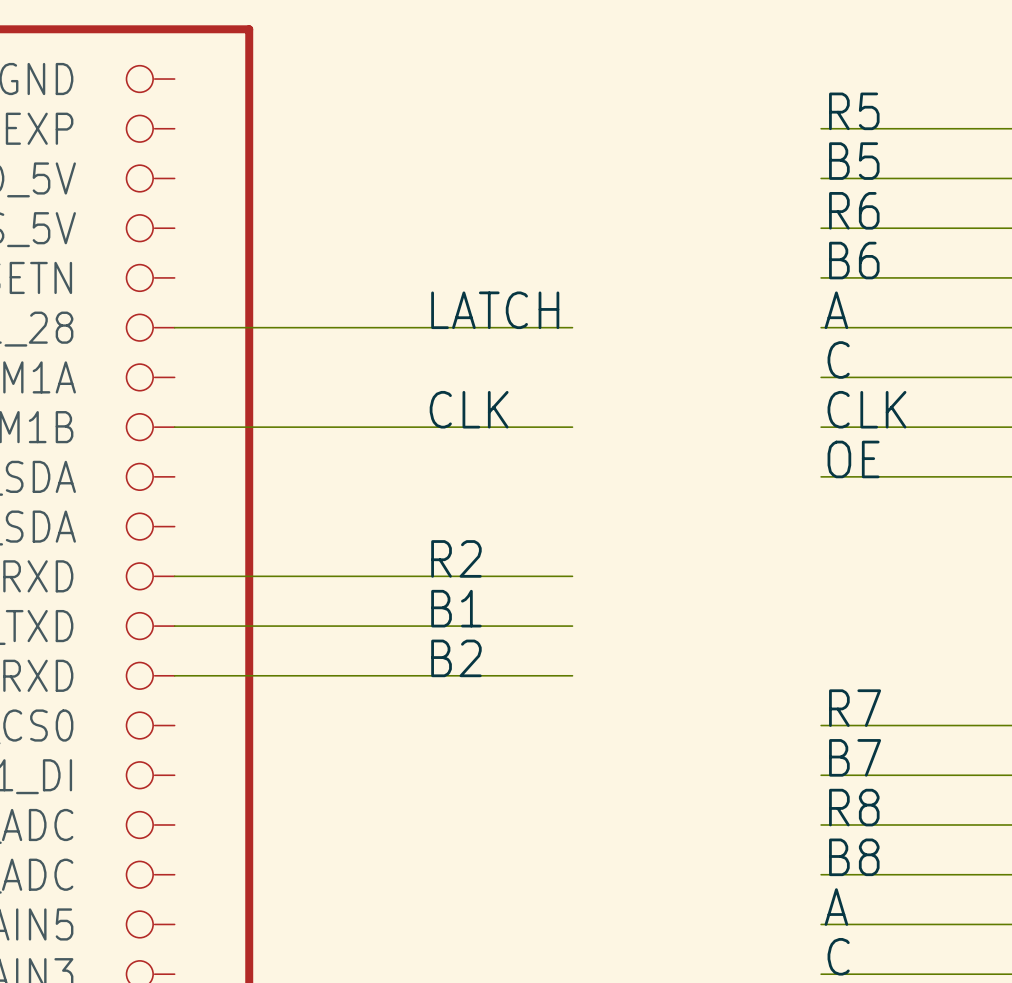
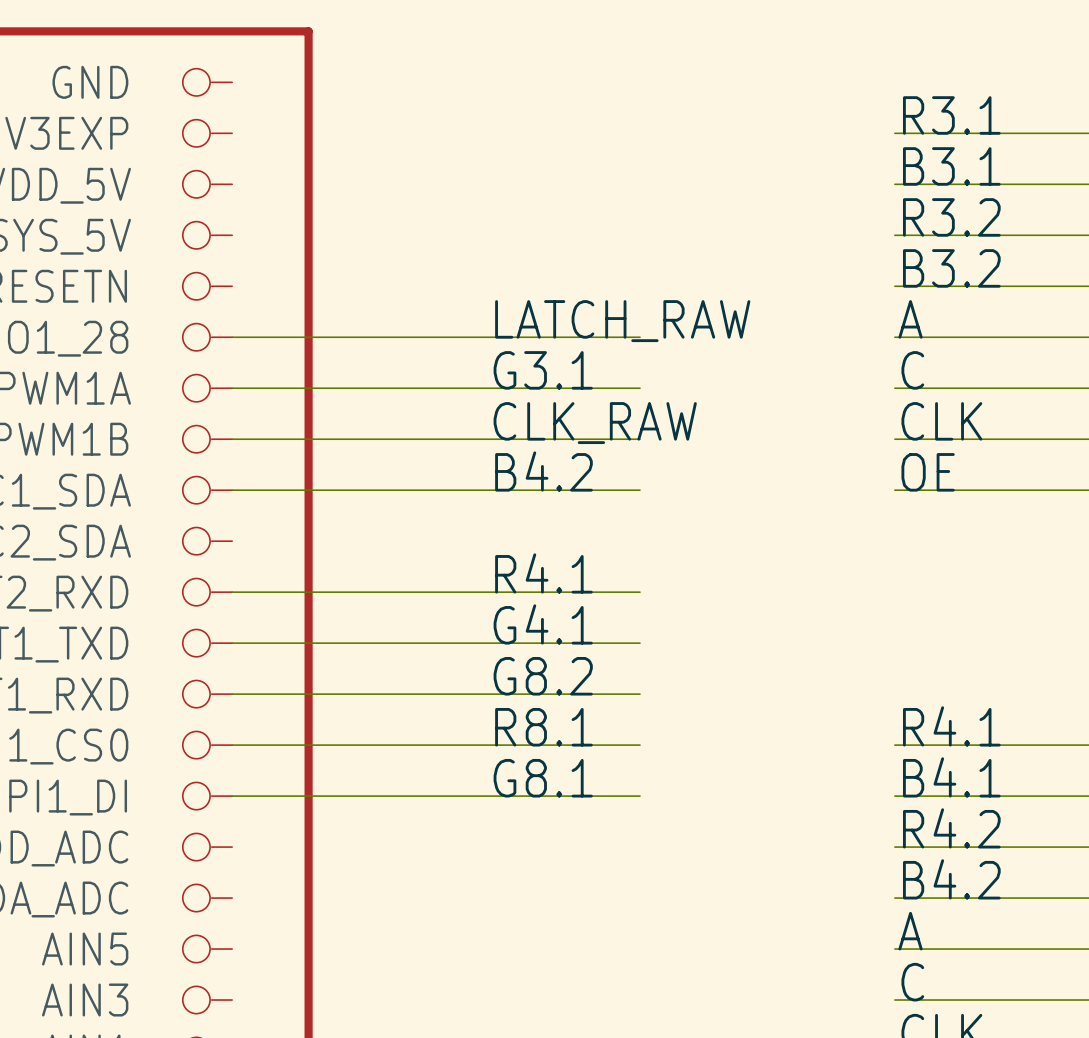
label: R5 (854, 111) -> R3.1 (951, 115)
label: B5 (854, 161) -> B3.1 (951, 166)
label: R6 (854, 210) -> R3.2 (951, 217)
label: B6 (854, 260) -> B3.2 (951, 268)
label: LATCH (495, 310) -> LATCH_RAW (622, 321)
label: none -> G3.1 (543, 370)
wire: none -> (232, 388) (639, 388)
label: CLK (469, 409) -> CLK_RAW (595, 423)
label: none -> B4.2 (543, 471)
wire: none -> (232, 490) (639, 490)
label: R2 (456, 558) -> R4.1 (543, 573)
label: B1 (456, 608) -> G4.1 (543, 624)
label: B2 (456, 658) -> G8.2 (543, 676)
label: none -> R8.1 (543, 727)
label: R7 (855, 708) -> R4.1 (951, 726)
wire: none -> (232, 745) (639, 745)
label: none -> G8.1 (543, 778)
label: B7 (855, 757) -> B4.1 (951, 777)
wire: none -> (232, 796) (639, 796)
label: R8 (854, 807) -> R4.2 (951, 828)
label: B8 (854, 857) -> B4.2 (951, 879)

